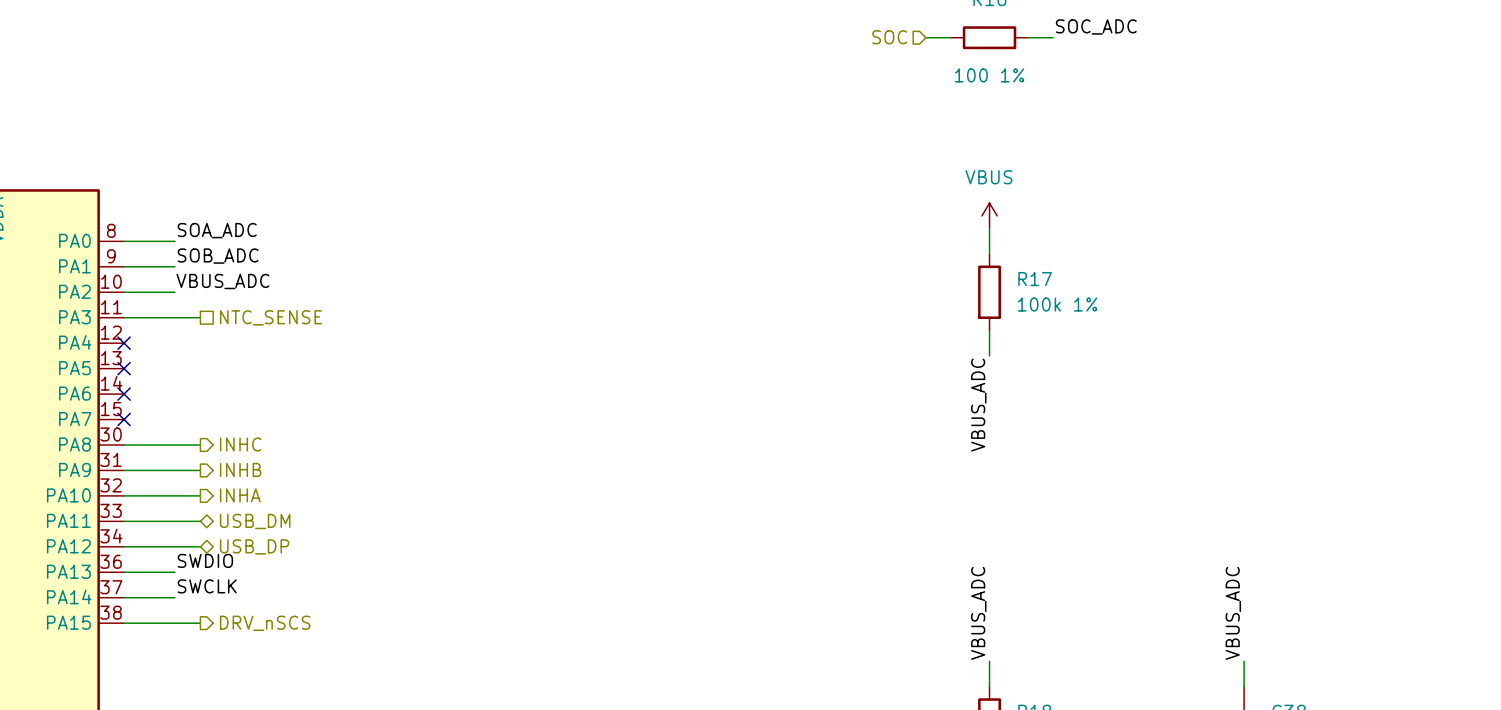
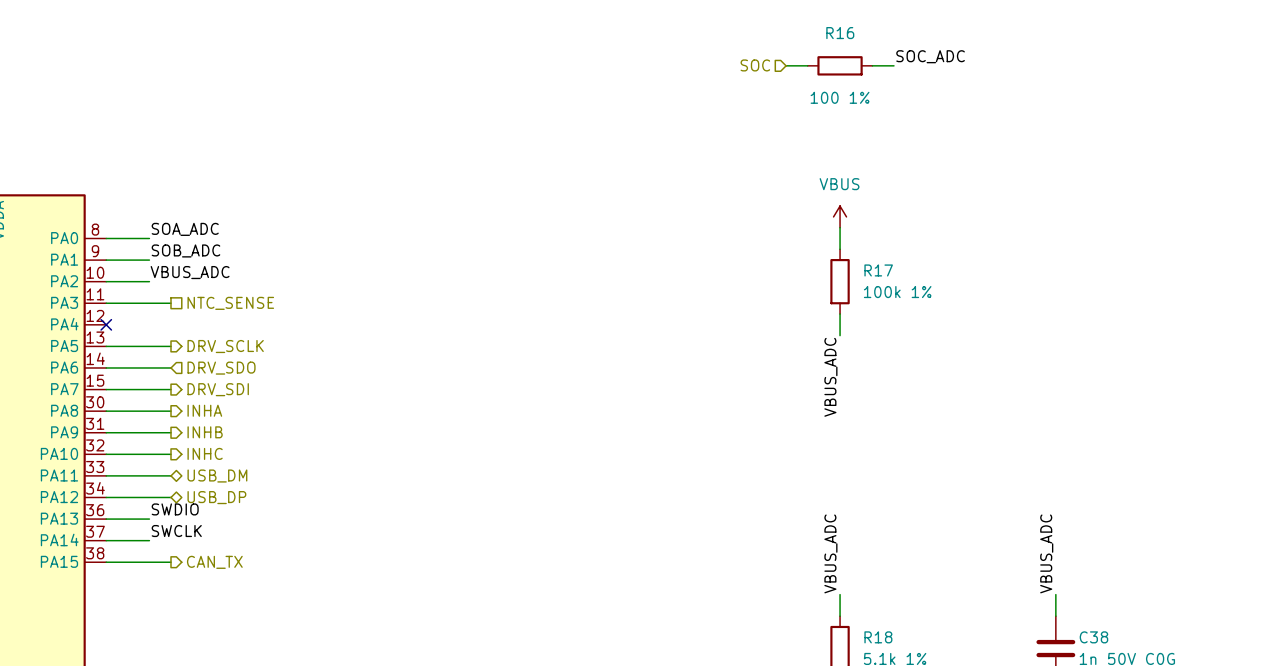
wire: none -> (106, 346) (171, 346)
no-connect mark: (124, 368) -> none
hierarchical label: none -> DRV_SCLK (225, 346)
wire: none -> (106, 367) (171, 367)
no-connect mark: (124, 394) -> none
hierarchical label: none -> DRV_SDO (221, 368)
wire: none -> (106, 389) (171, 389)
no-connect mark: (124, 419) -> none
hierarchical label: none -> DRV_SDI (218, 389)
hierarchical label: INHC (240, 444) -> INHA (204, 410)
hierarchical label: INHA (240, 495) -> INHC (205, 453)
hierarchical label: DRV_nSCS (265, 623) -> CAN_TX (214, 562)

